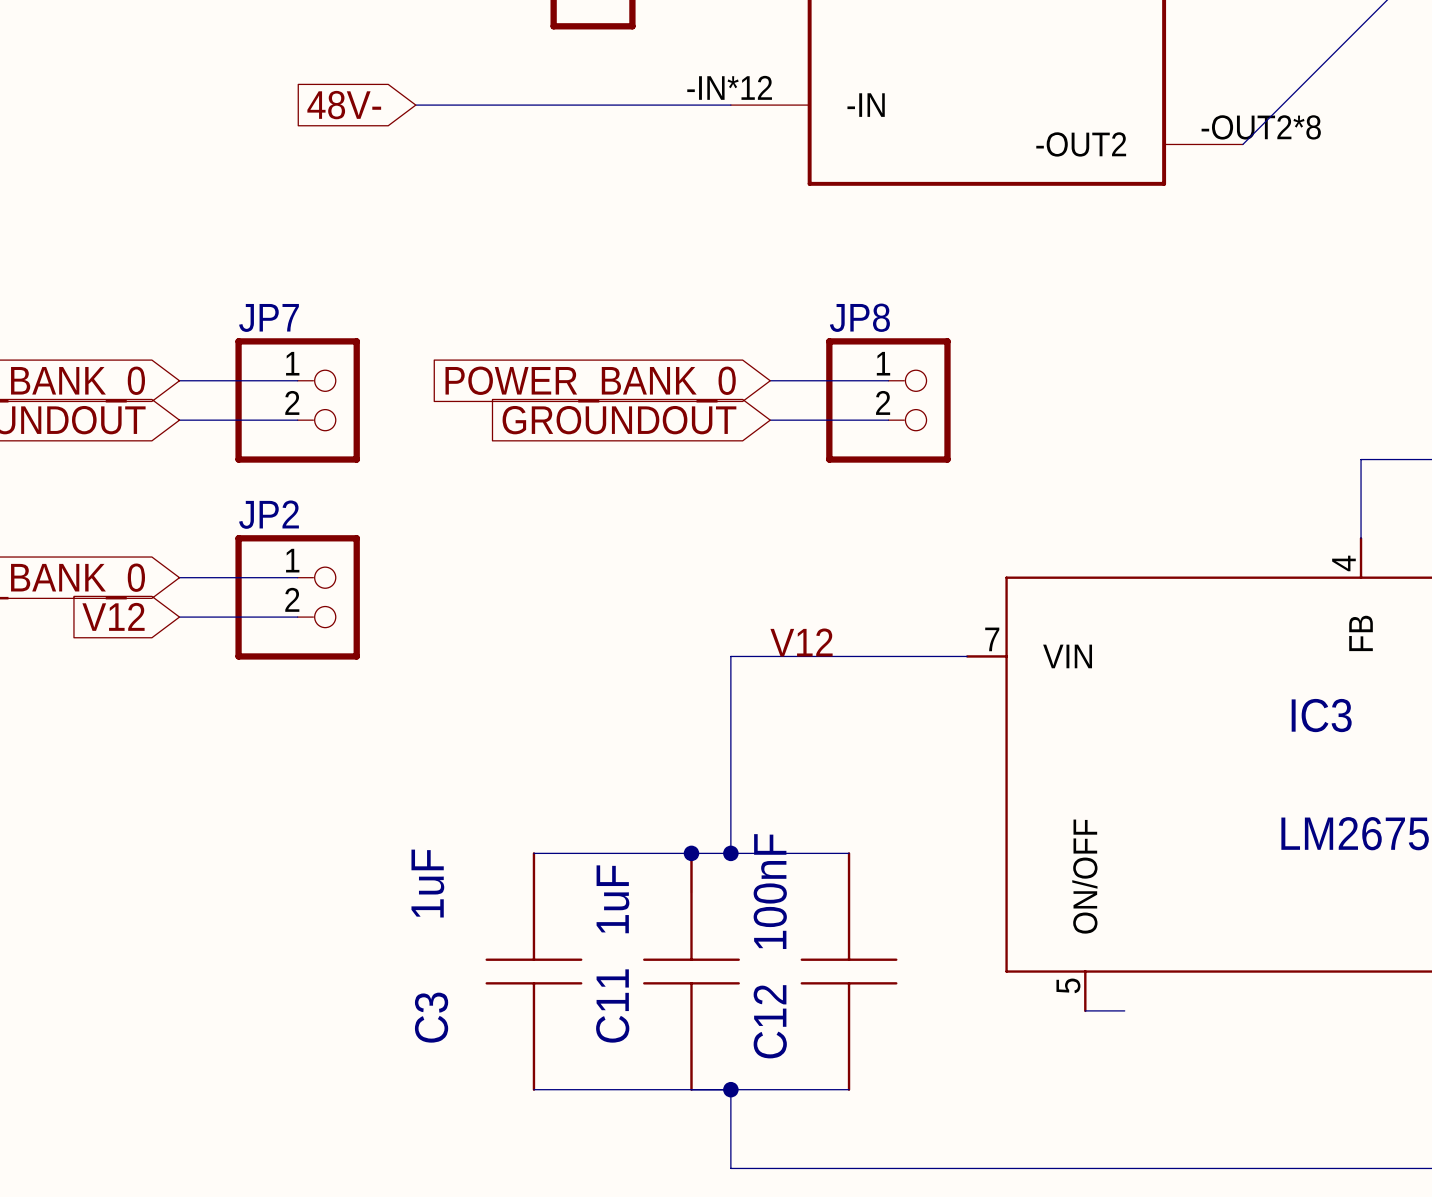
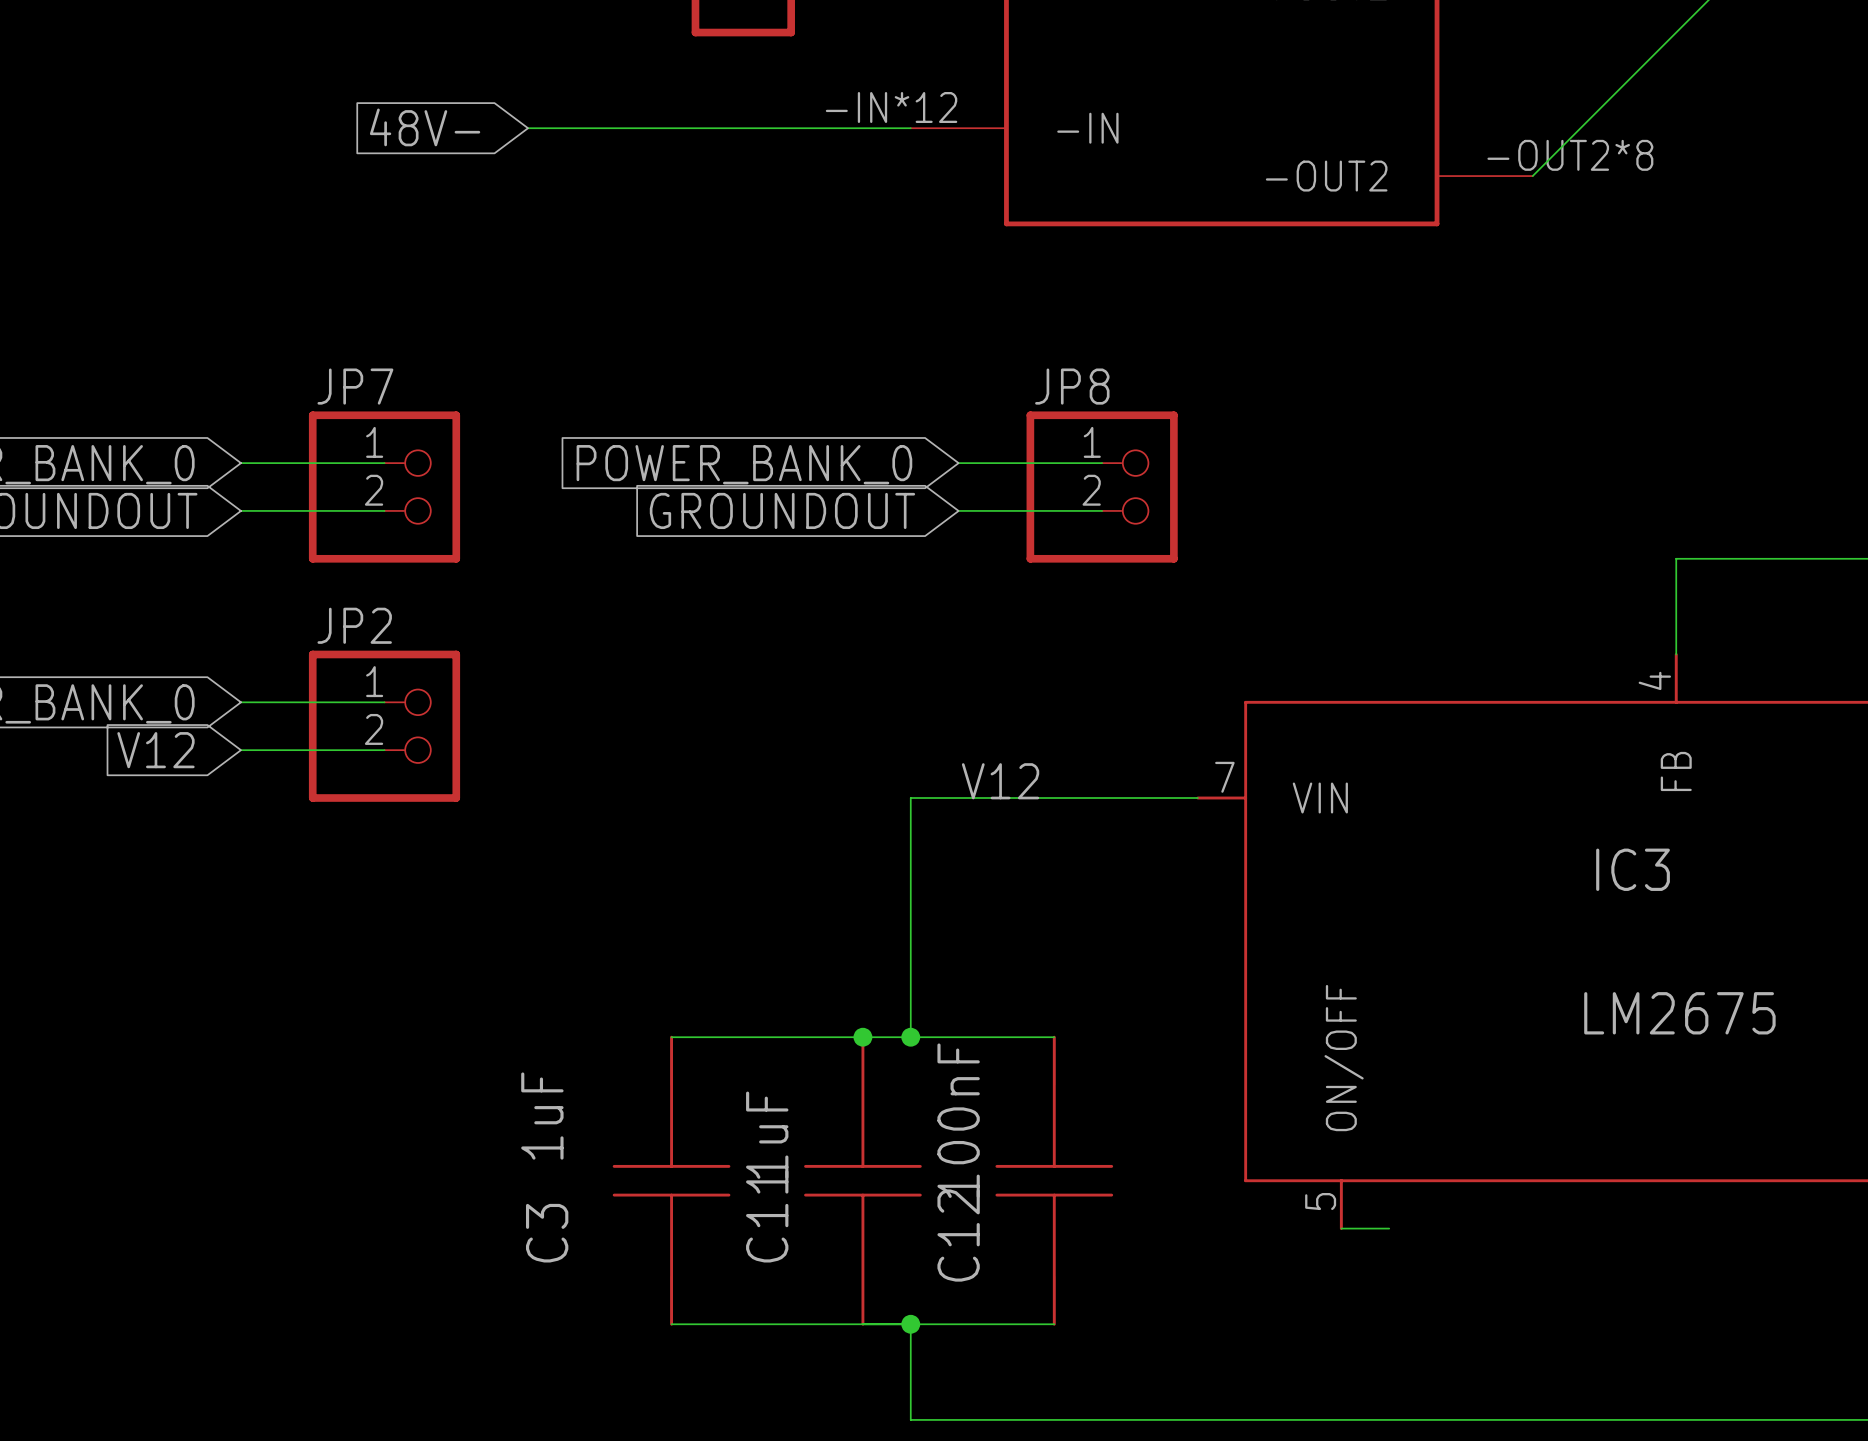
C3 value position: 1uF (427, 883) -> 1uF (542, 1116)
C12 value position: 100nF (770, 891) -> 100nF (958, 1120)
C11 value position: 1uF (612, 899) -> 1uF (767, 1135)

